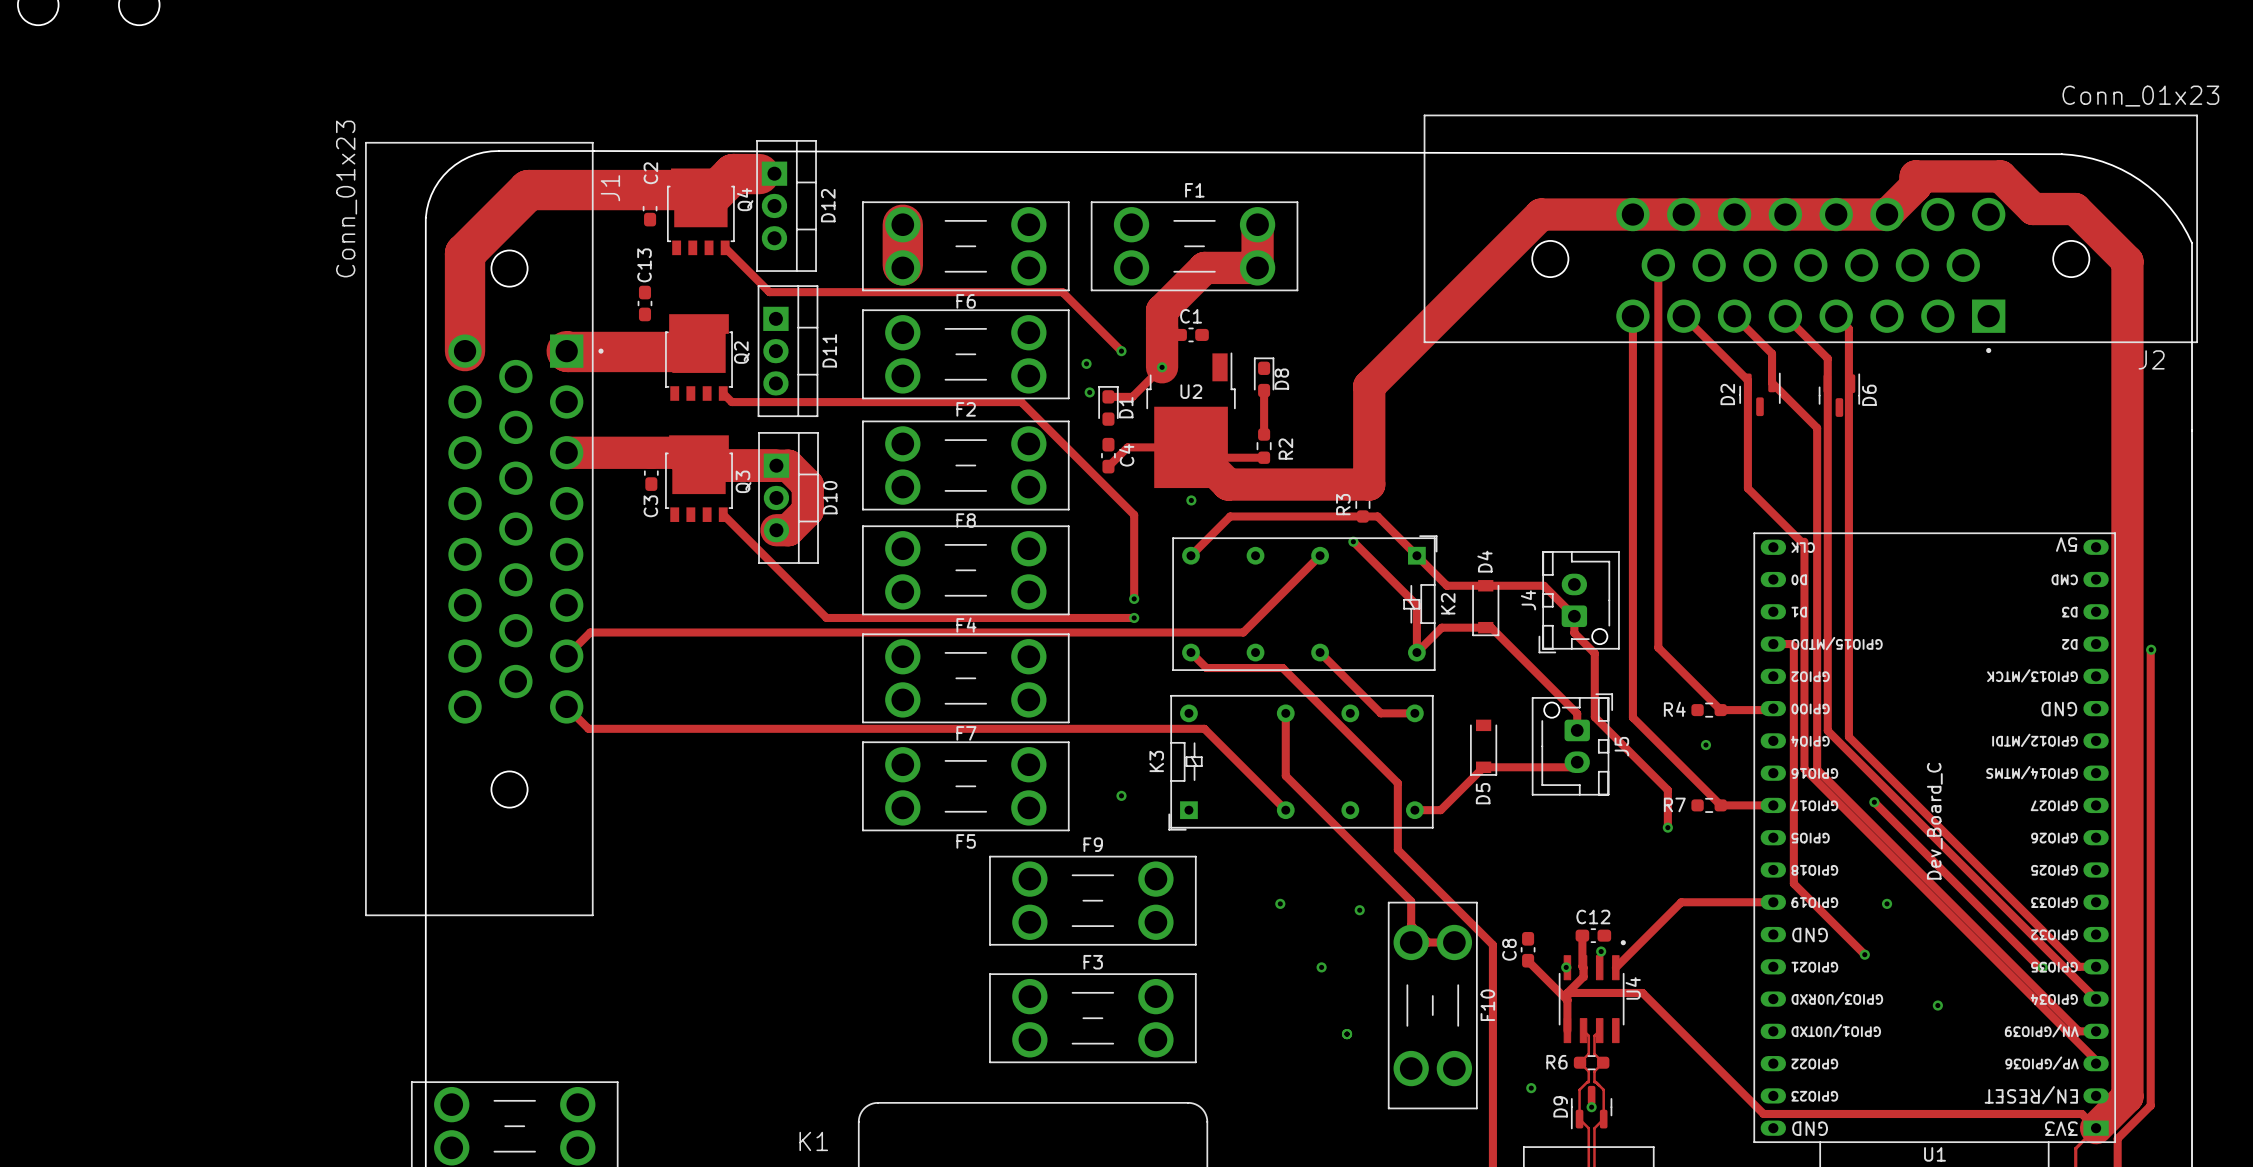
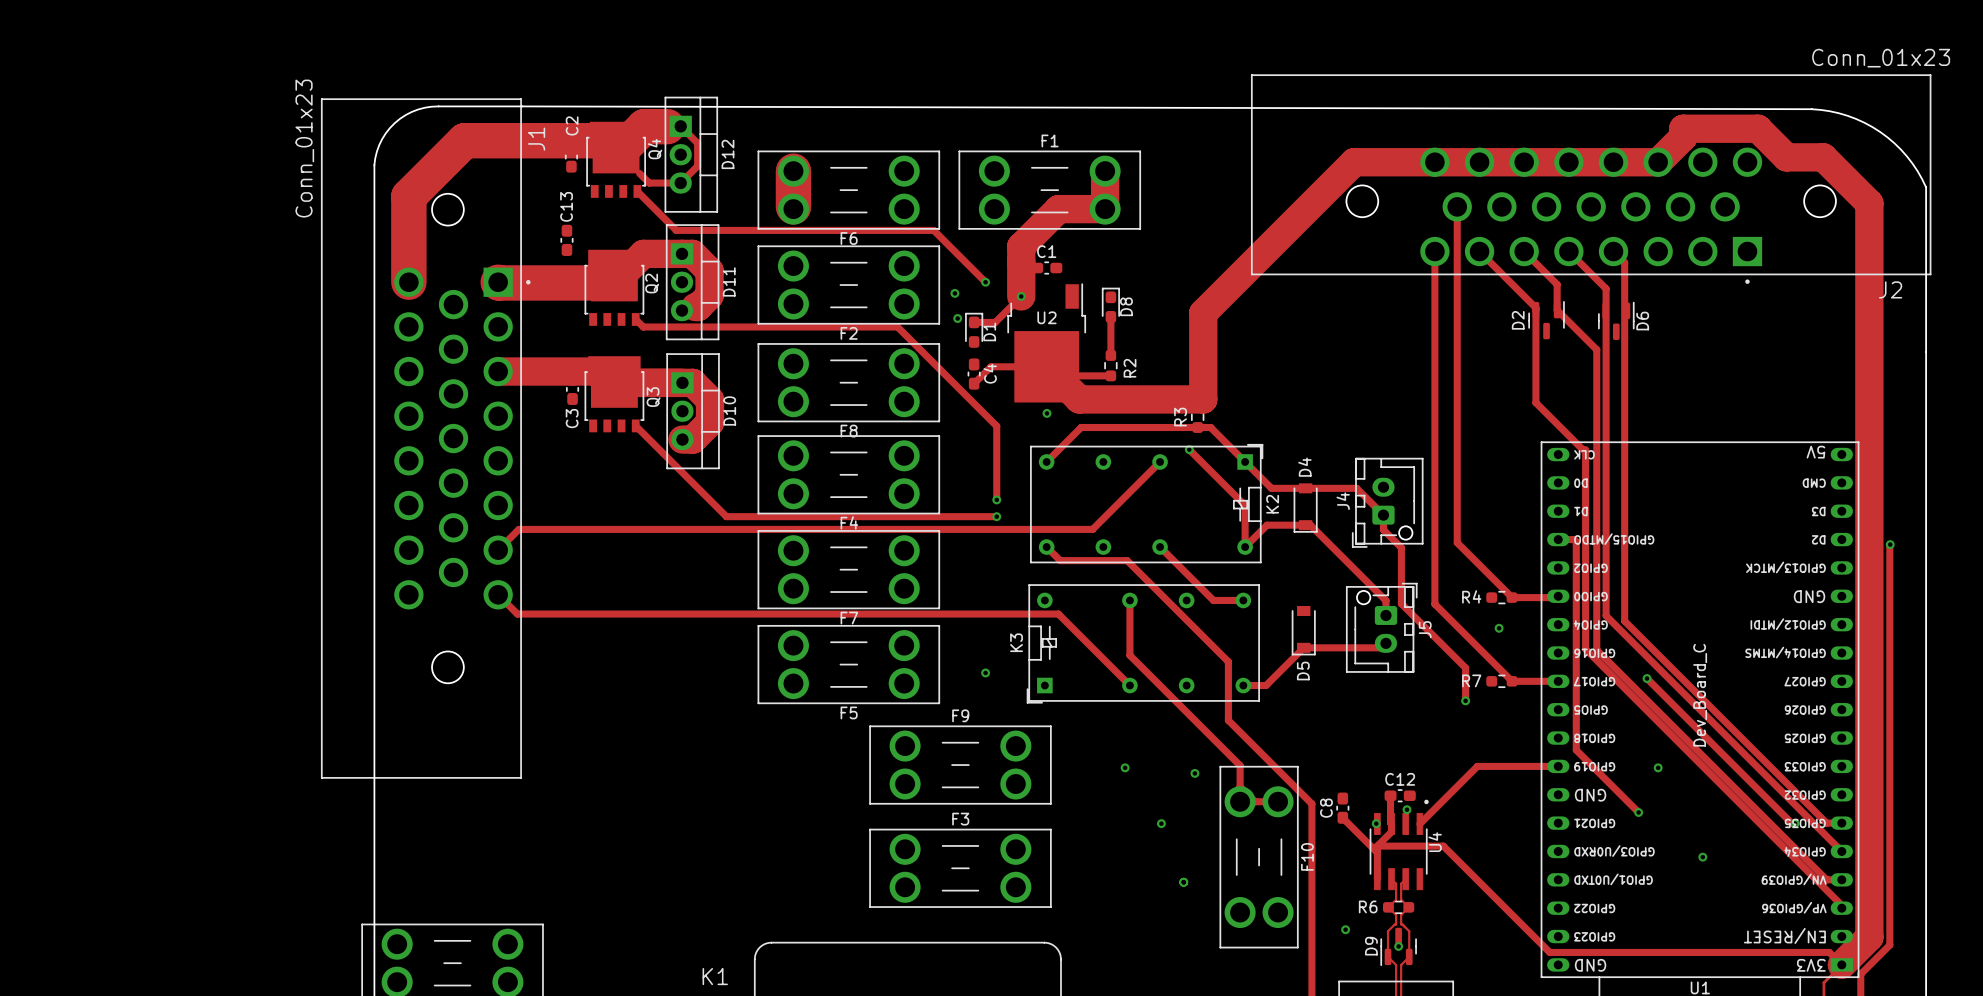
track: none -> (680, 126) (697, 143) (697, 166) (680, 183) (649, 183) (639, 173)
track: none -> (614, 282) (643, 253) (692, 253) (709, 271) (709, 295) (698, 307) (695, 307)

